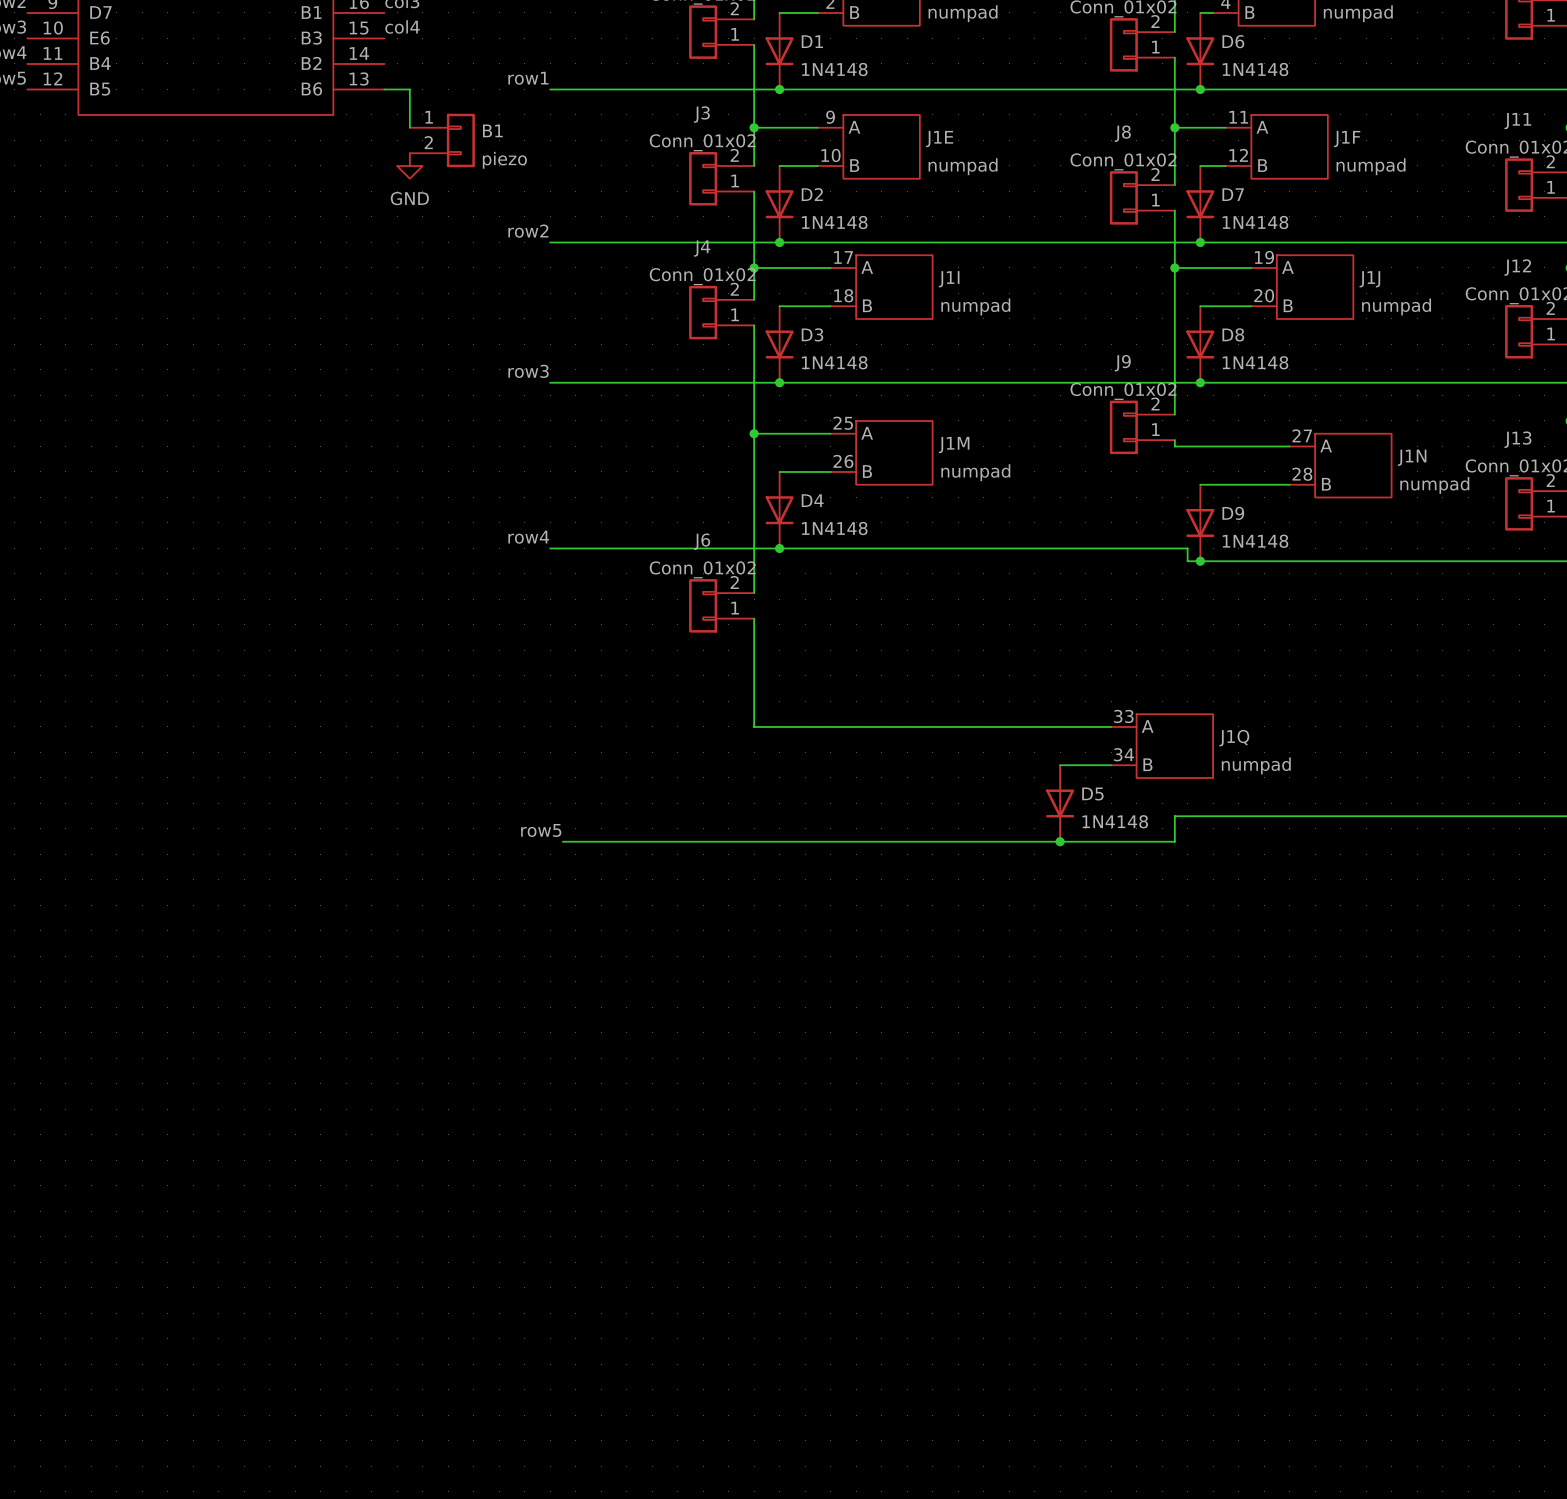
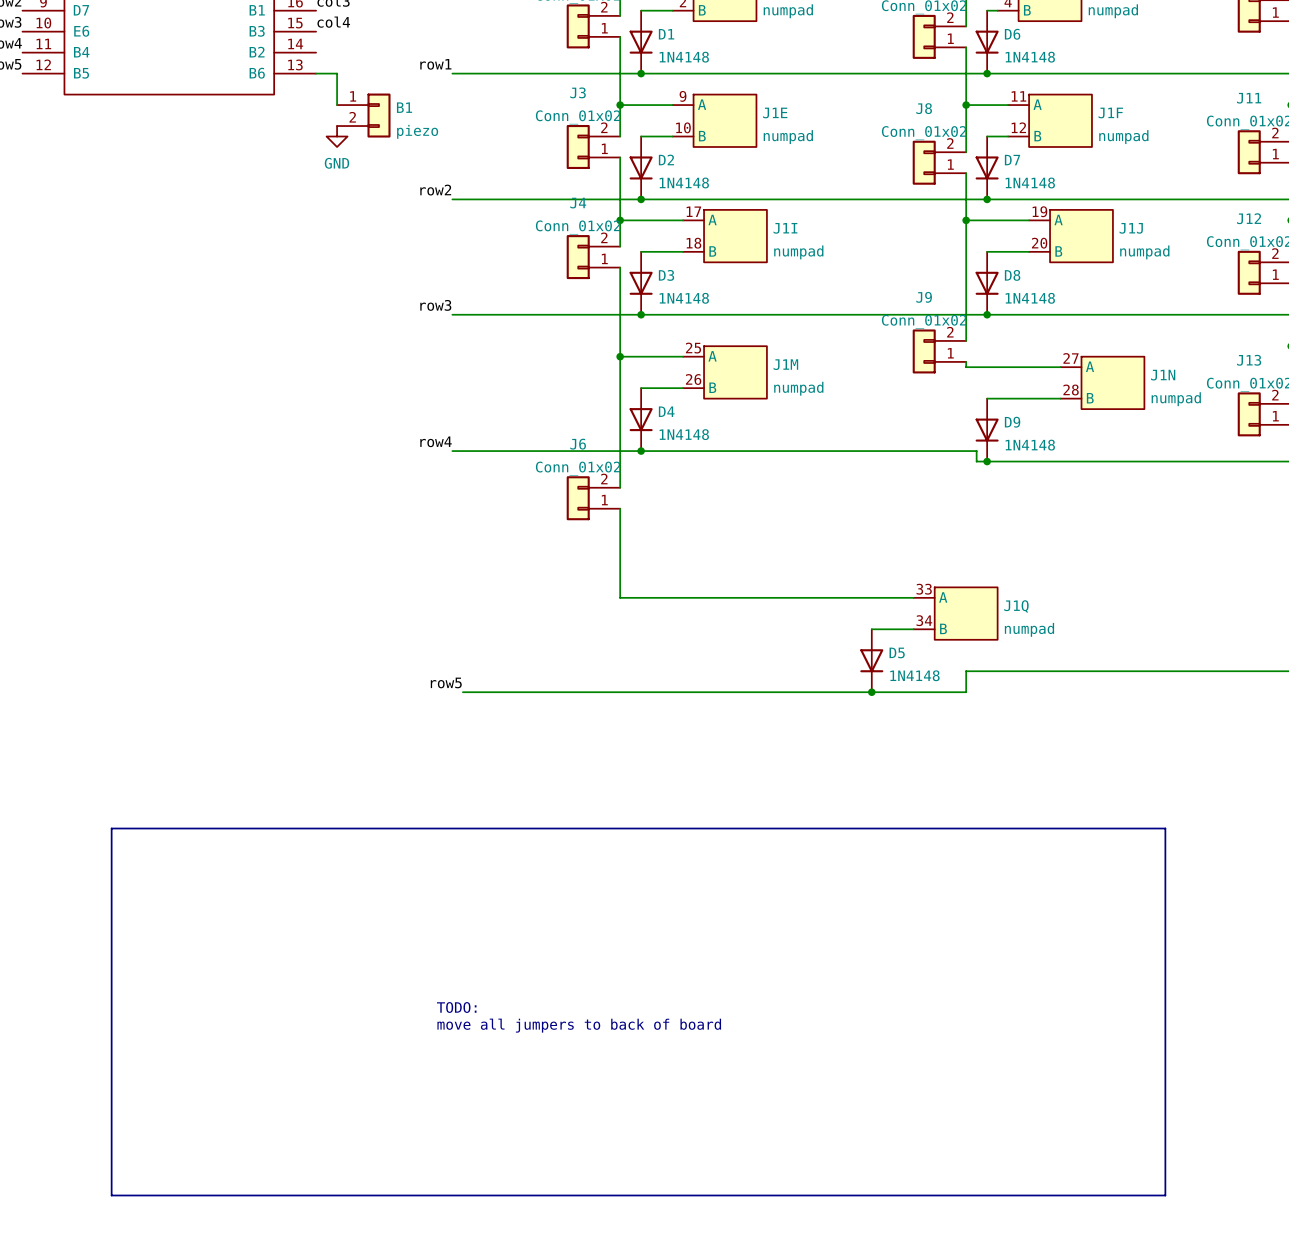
line: none -> (111, 828) (111, 1195) (1165, 1195) (1165, 828) (111, 828)
text: none -> TODO: (456, 1007)
text: none -> move all jumpers to back of board (579, 1025)

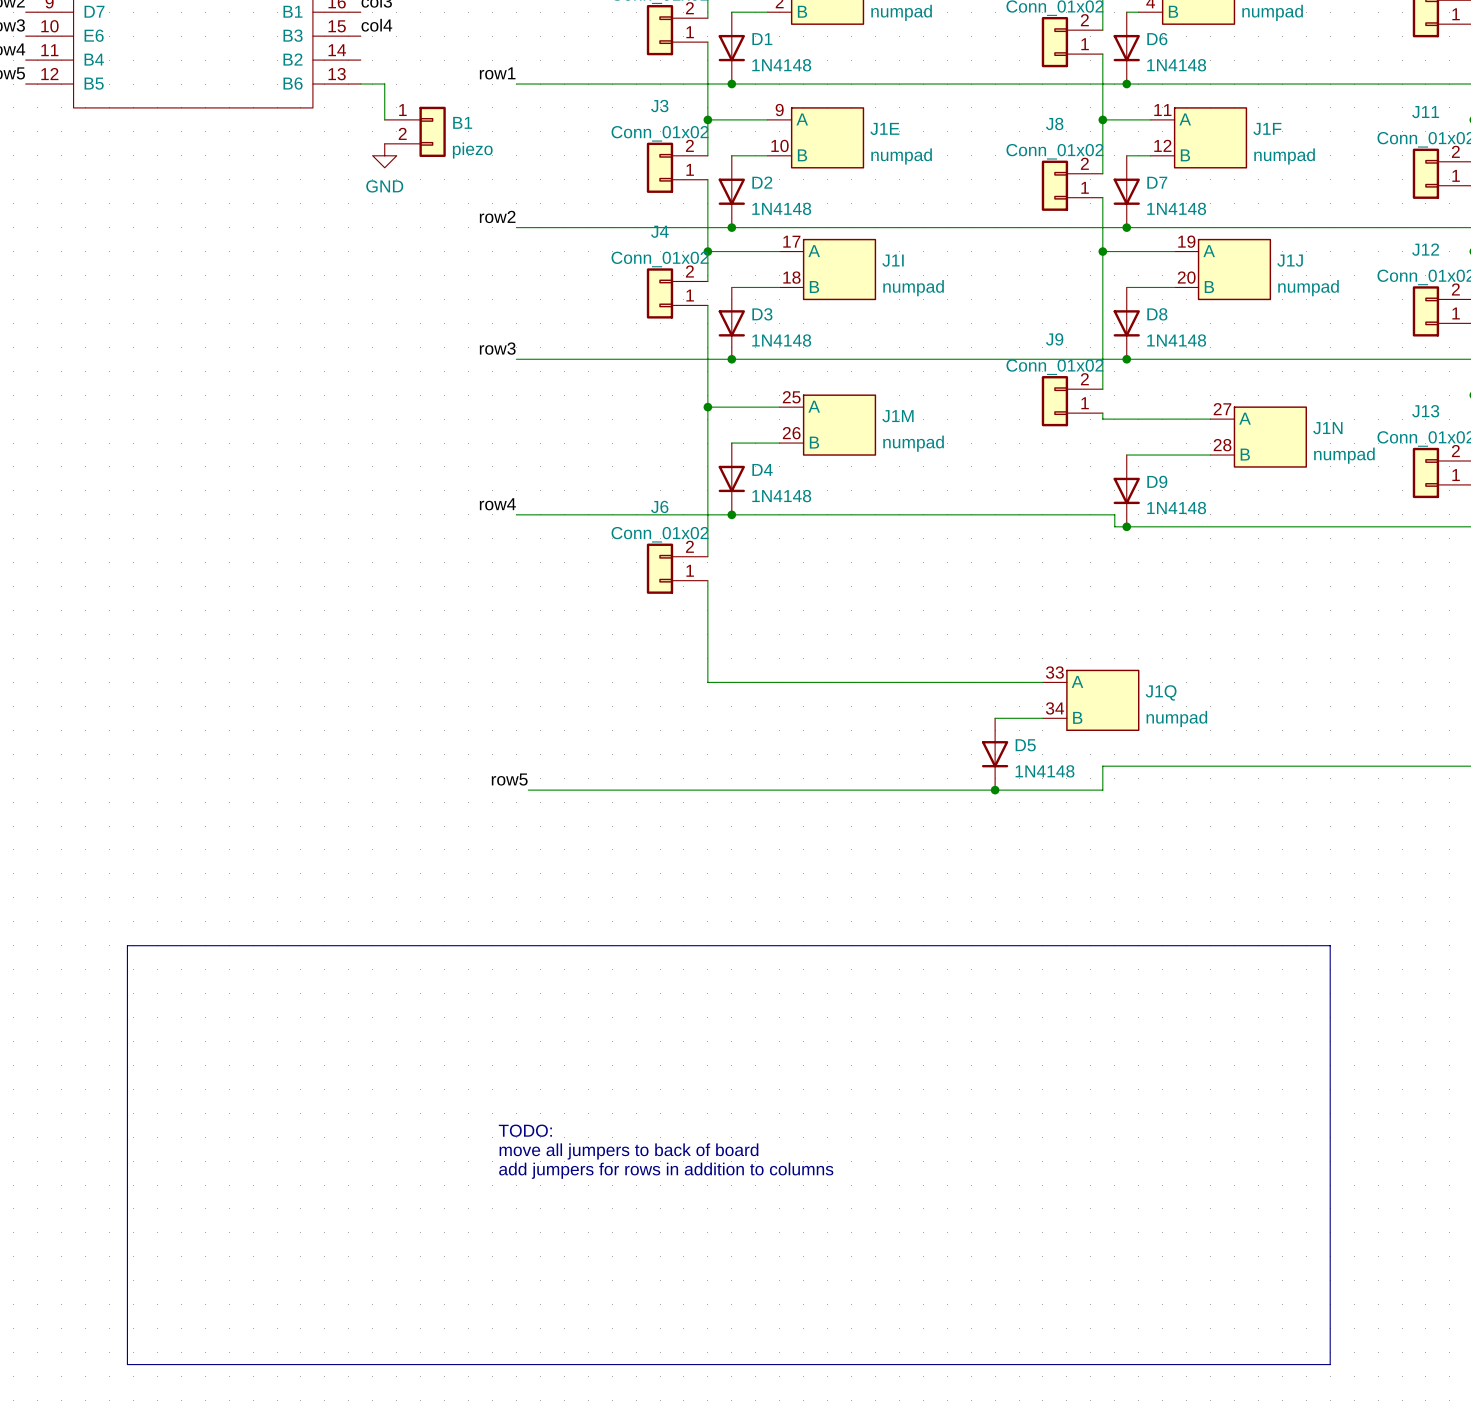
text: none -> TODO: (525, 1130)
text: TODO: (456, 1007) -> move all jumpers to back of board (628, 1151)
text: move all jumpers to back of board (579, 1025) -> add jumpers for rows in addition to columns (666, 1170)

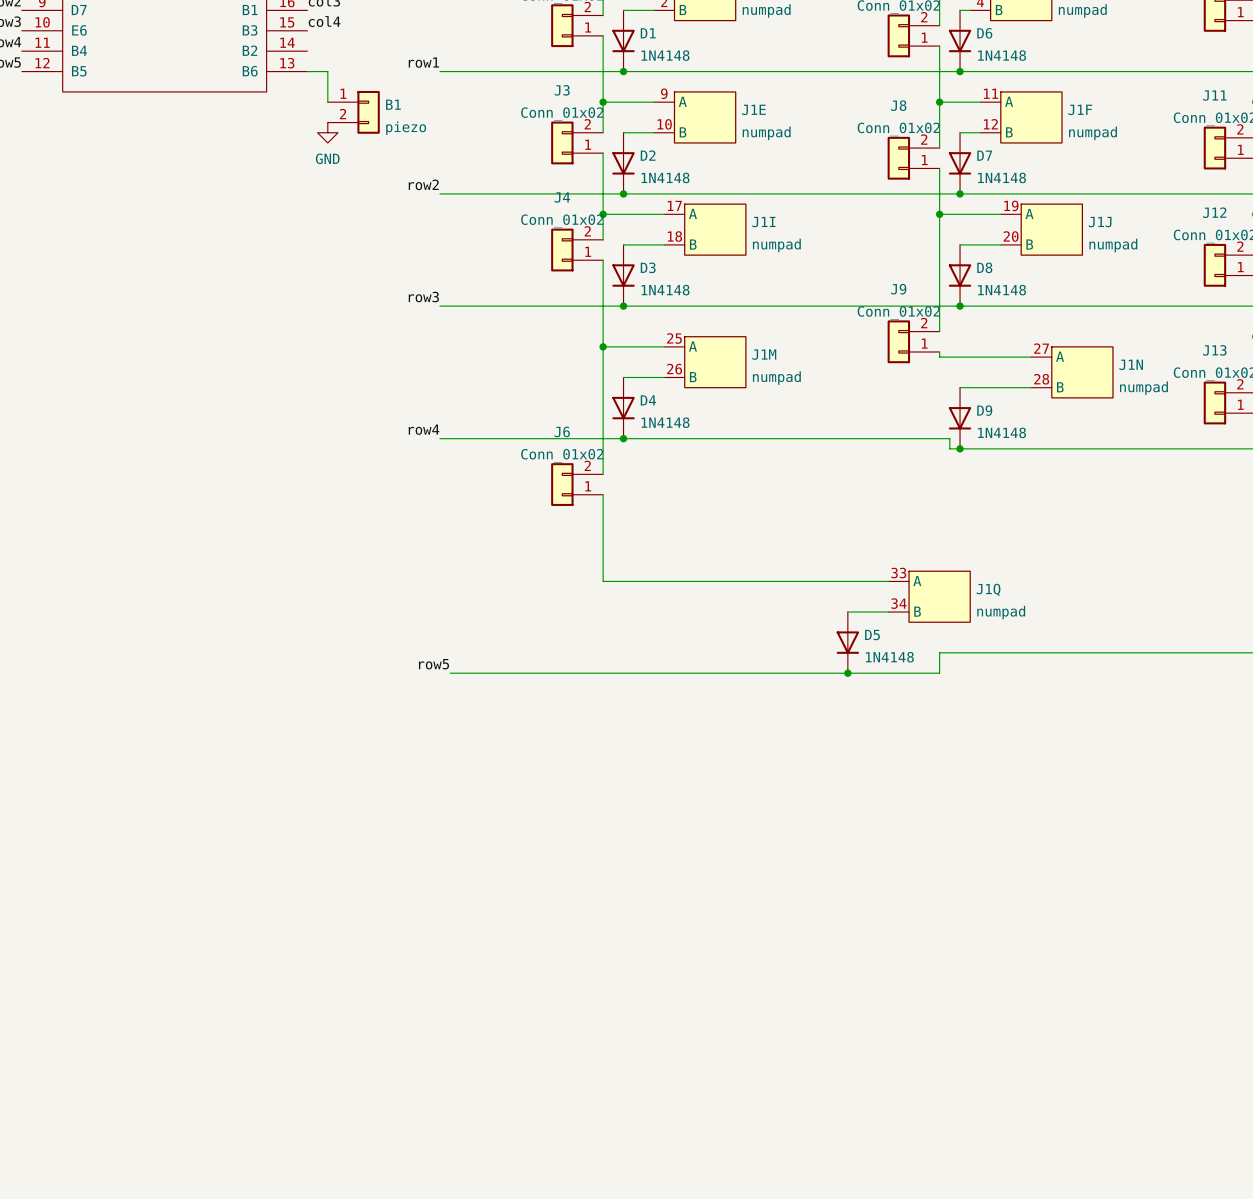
line: (127, 945) (127, 1364) (1330, 1364) (1330, 945) (127, 945) -> none
text: TODO: (525, 1130) -> none
text: move all jumpers to back of board (628, 1151) -> none
text: add jumpers for rows in addition to columns (666, 1170) -> none

